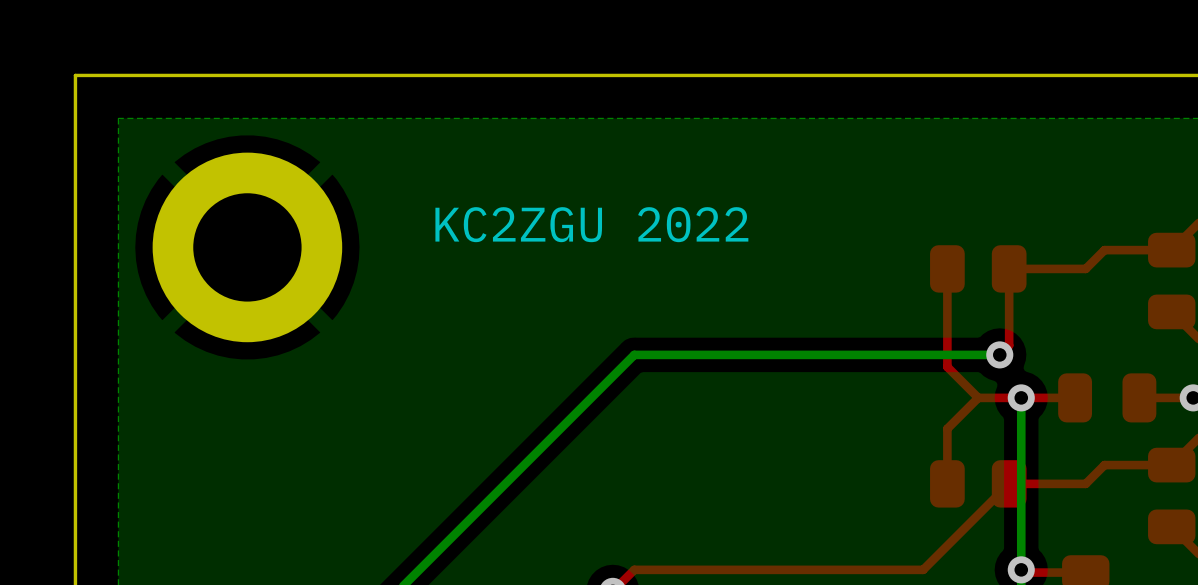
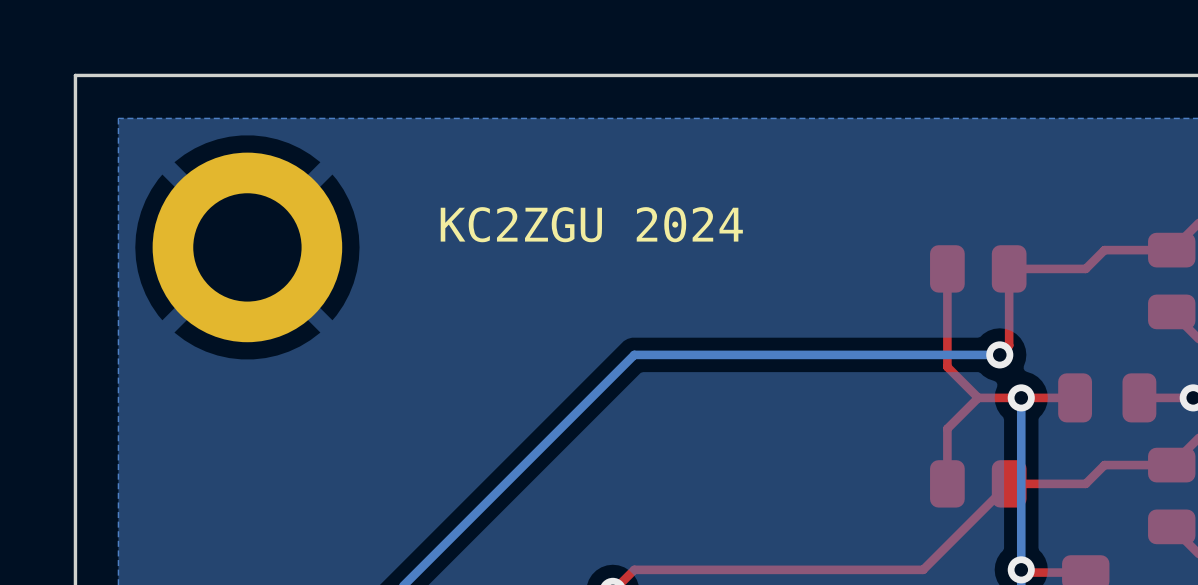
text: KC2ZGU 2022 (591, 224) -> KC2ZGU 2024 (591, 224)

